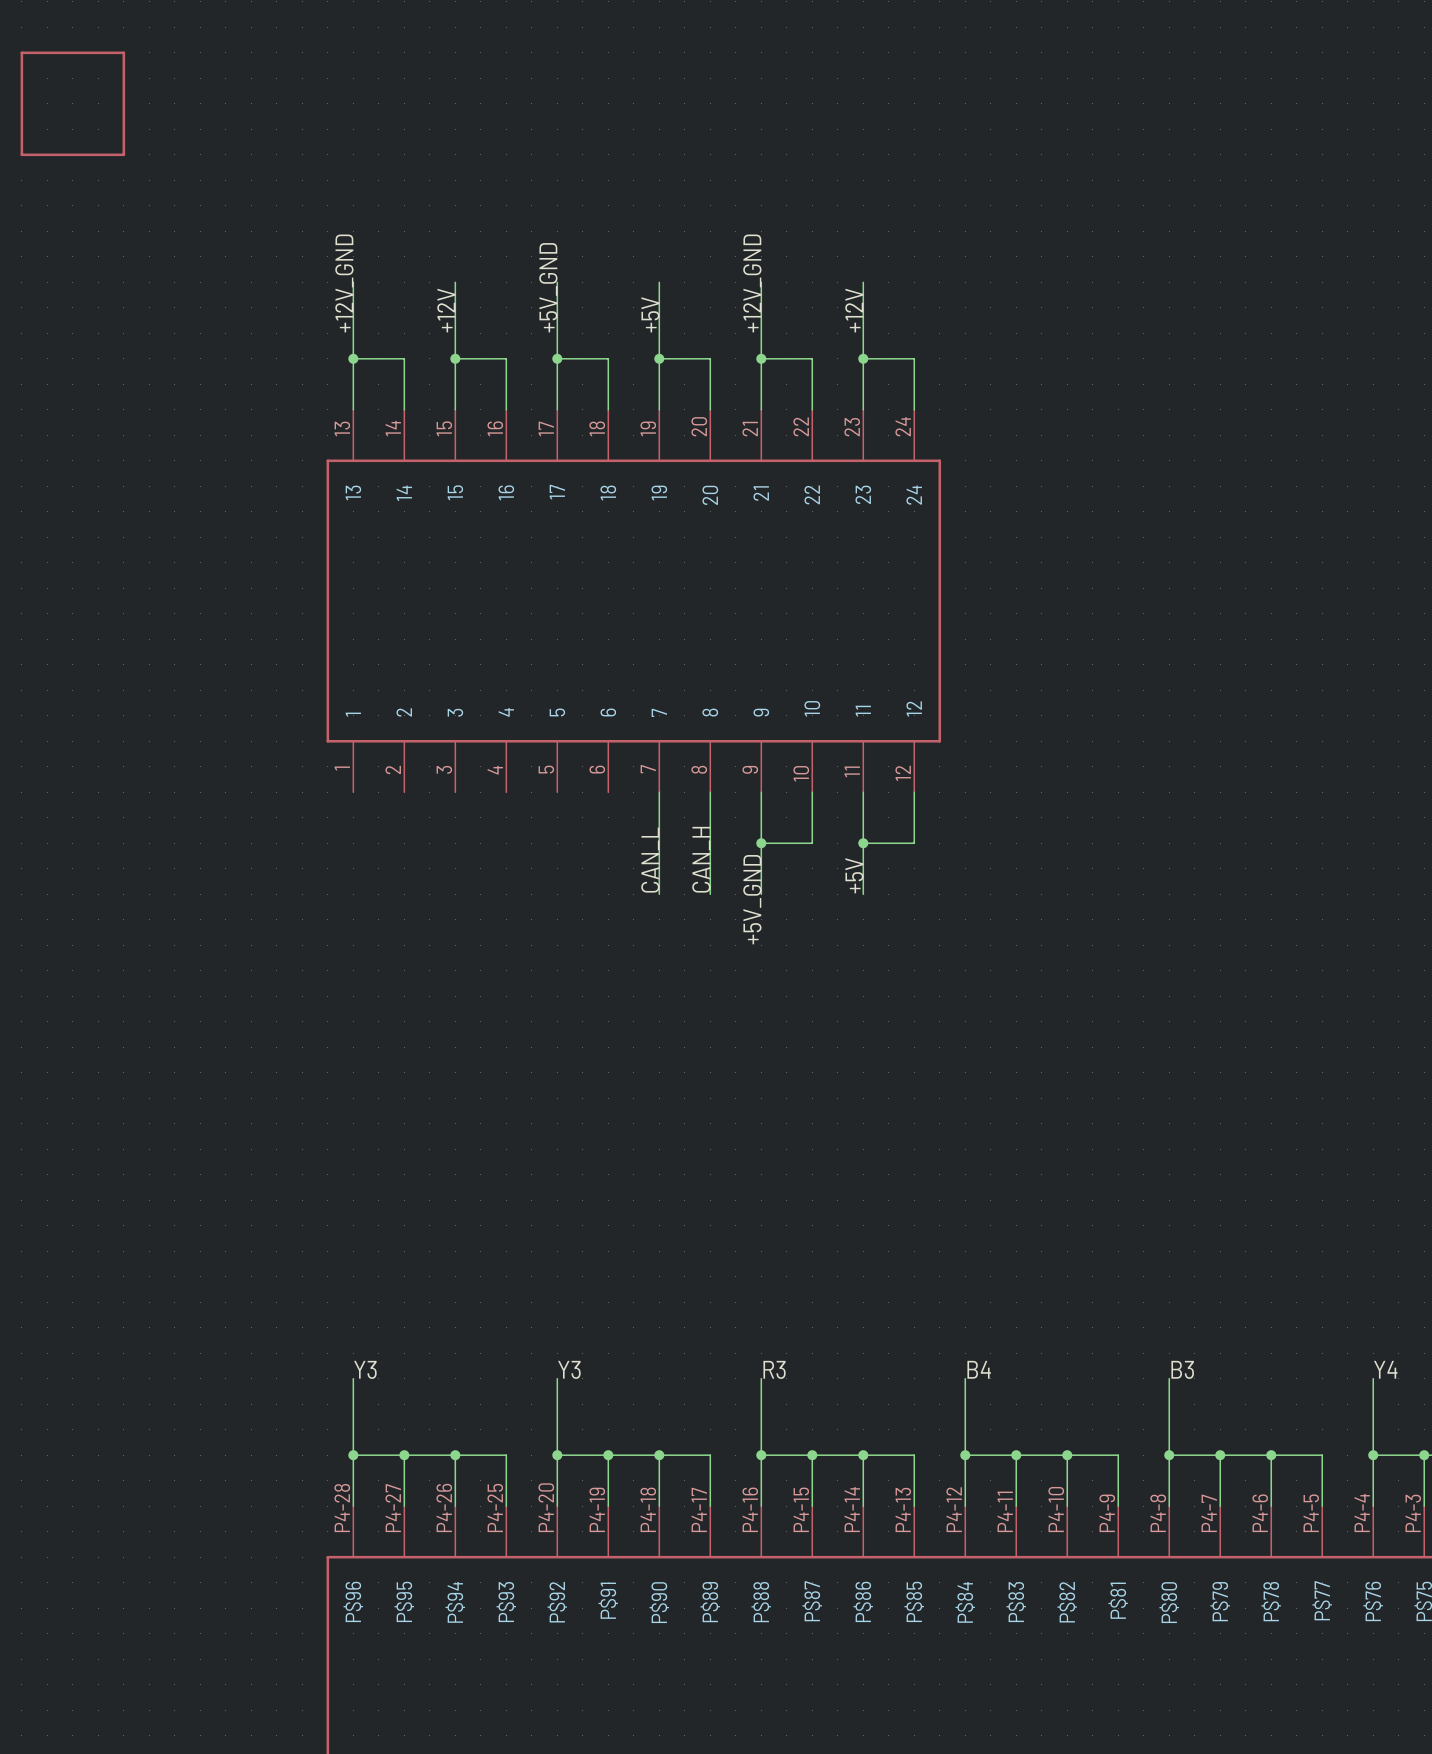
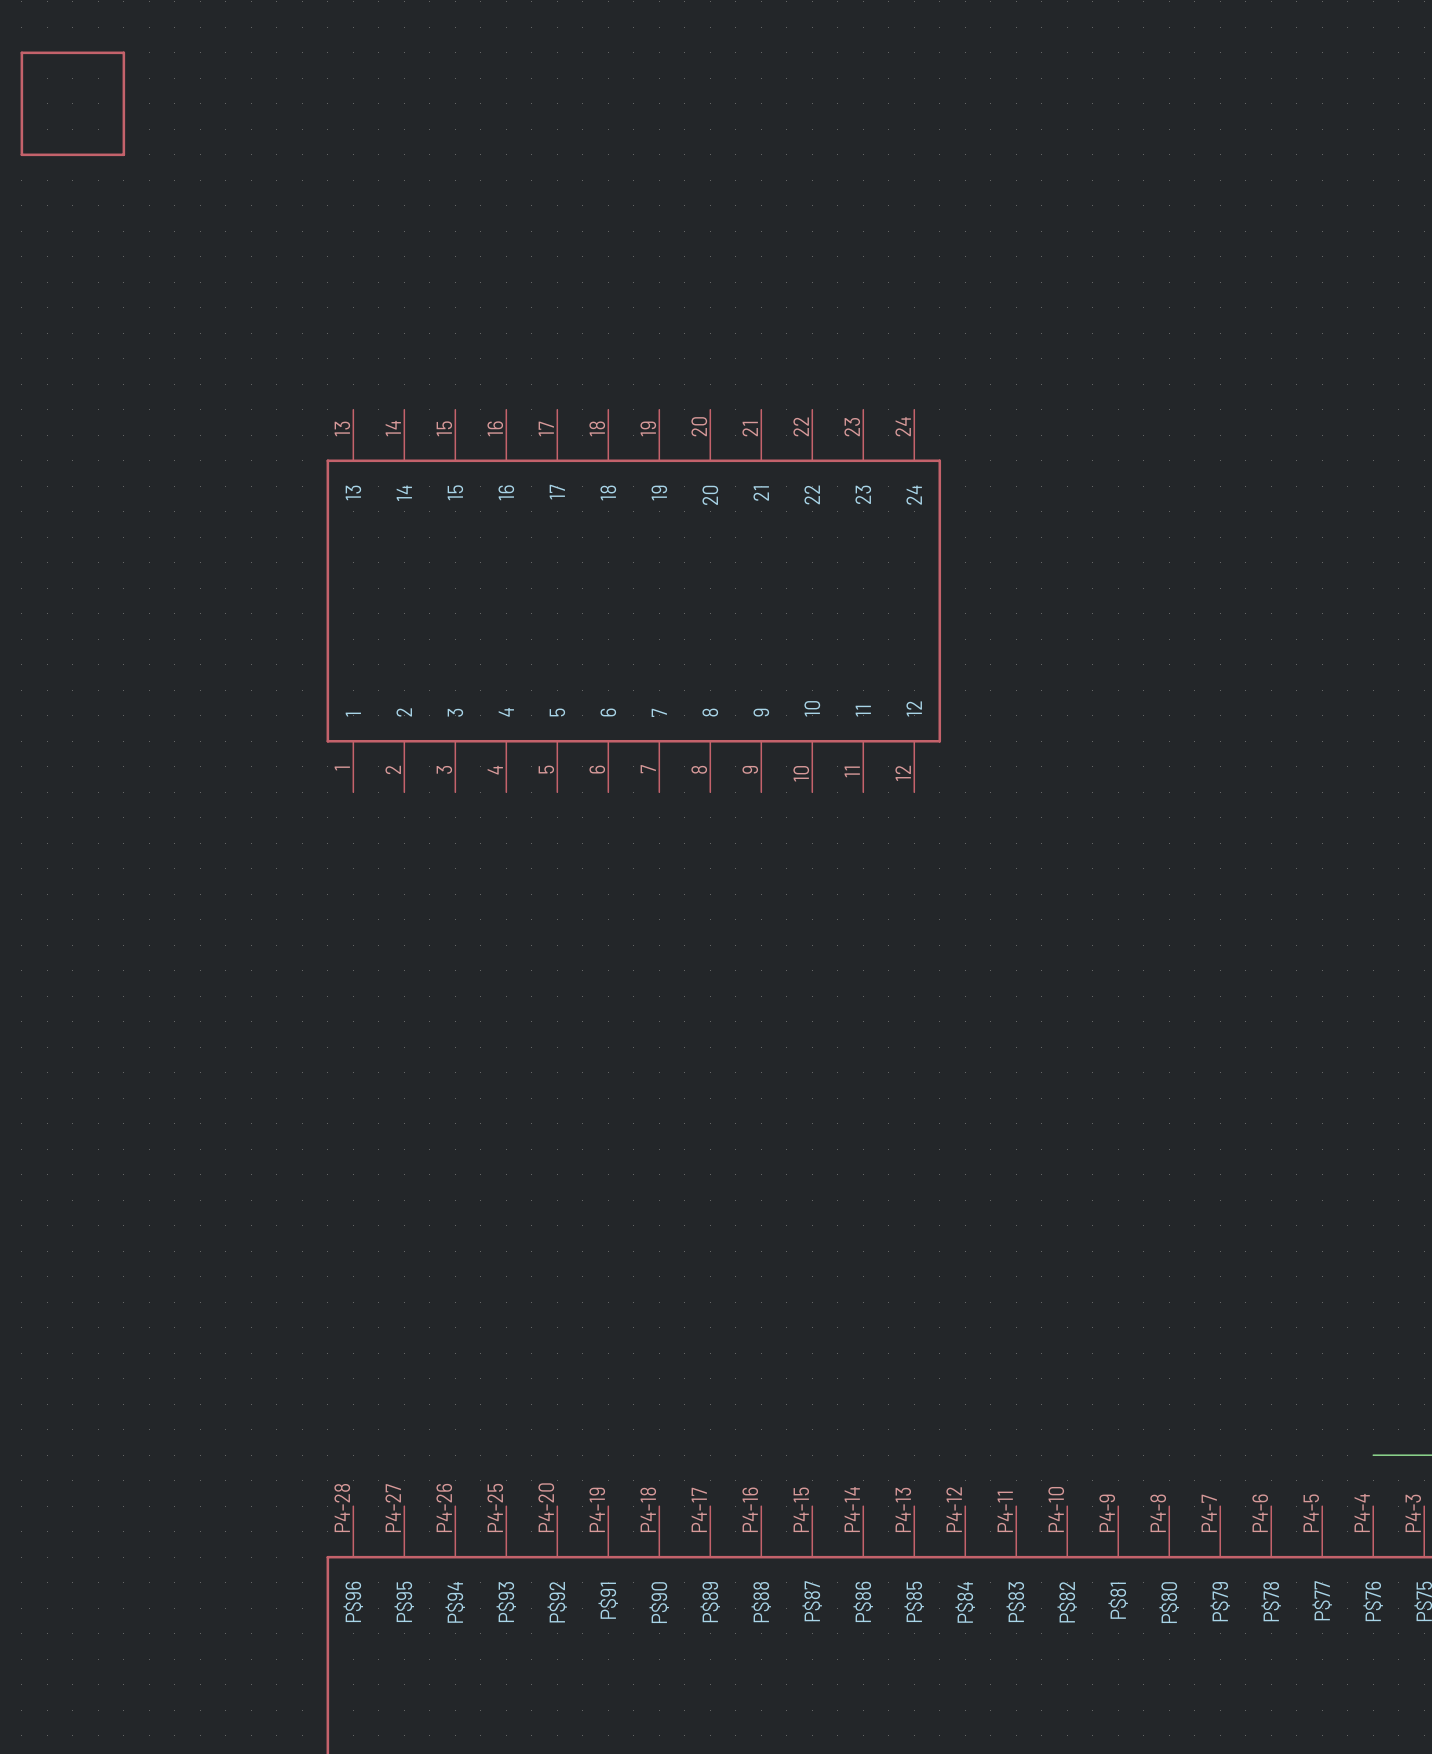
wire: (353, 282) (353, 409) -> none
wire: (455, 282) (455, 409) -> none
wire: (557, 282) (557, 409) -> none
wire: (659, 282) (659, 409) -> none
wire: (761, 282) (761, 409) -> none
wire: (863, 282) (863, 409) -> none
label: +12V_GND (344, 283) -> none
label: +12V_GND (752, 283) -> none
label: +5V_GND (548, 287) -> none
label: +12V (446, 310) -> none
label: +12V (854, 310) -> none
label: +5V (650, 314) -> none
wire: (353, 358) (404, 358) (404, 409) -> none
junction: (353, 358) -> none
wire: (455, 358) (506, 358) (506, 409) -> none
junction: (455, 358) -> none
wire: (557, 358) (608, 358) (608, 409) -> none
junction: (557, 358) -> none
wire: (659, 358) (710, 358) (710, 409) -> none
junction: (659, 358) -> none
wire: (761, 358) (812, 358) (812, 409) -> none
junction: (761, 358) -> none
wire: (863, 358) (914, 358) (914, 409) -> none
junction: (863, 358) -> none
wire: (659, 792) (659, 894) -> none
wire: (710, 792) (710, 894) -> none
wire: (761, 792) (761, 894) -> none
wire: (812, 792) (812, 843) (761, 843) -> none
wire: (863, 792) (863, 894) -> none
wire: (914, 792) (914, 843) (863, 843) -> none
junction: (761, 843) -> none
junction: (863, 843) -> none
label: CAN_H (701, 859) -> none
label: CAN_L (650, 860) -> none
label: +5V (854, 875) -> none
label: +5V_GND (752, 899) -> none
label: Y3 (365, 1369) -> none
label: Y3 (569, 1369) -> none
label: R3 (774, 1369) -> none
label: B4 (979, 1369) -> none
label: B3 (1182, 1369) -> none
label: Y4 (1385, 1369) -> none
wire: (353, 1378) (353, 1506) -> none
wire: (557, 1378) (557, 1506) -> none
wire: (761, 1378) (761, 1506) -> none
wire: (965, 1378) (965, 1506) -> none
wire: (1169, 1378) (1169, 1506) -> none
wire: (1373, 1378) (1373, 1506) -> none
wire: (353, 1455) (506, 1455) (506, 1506) -> none
junction: (353, 1455) -> none
wire: (404, 1455) (404, 1506) -> none
junction: (404, 1455) -> none
wire: (455, 1455) (455, 1506) -> none
junction: (455, 1455) -> none
wire: (557, 1455) (710, 1455) (710, 1506) -> none
junction: (557, 1455) -> none
wire: (608, 1455) (608, 1506) -> none
junction: (608, 1455) -> none
wire: (659, 1455) (659, 1506) -> none
junction: (659, 1455) -> none
wire: (761, 1455) (914, 1455) (914, 1506) -> none
junction: (761, 1455) -> none
wire: (812, 1455) (812, 1506) -> none
junction: (812, 1455) -> none
wire: (863, 1455) (863, 1506) -> none
junction: (863, 1455) -> none
wire: (965, 1455) (1118, 1455) (1118, 1506) -> none
junction: (965, 1455) -> none
wire: (1016, 1455) (1016, 1506) -> none
junction: (1016, 1455) -> none
wire: (1067, 1455) (1067, 1506) -> none
junction: (1067, 1455) -> none
wire: (1169, 1455) (1322, 1455) (1322, 1506) -> none
junction: (1169, 1455) -> none
wire: (1220, 1455) (1220, 1506) -> none
junction: (1220, 1455) -> none
wire: (1271, 1455) (1271, 1506) -> none
junction: (1271, 1455) -> none
junction: (1373, 1455) -> none
wire: (1424, 1455) (1424, 1506) -> none
junction: (1424, 1455) -> none

